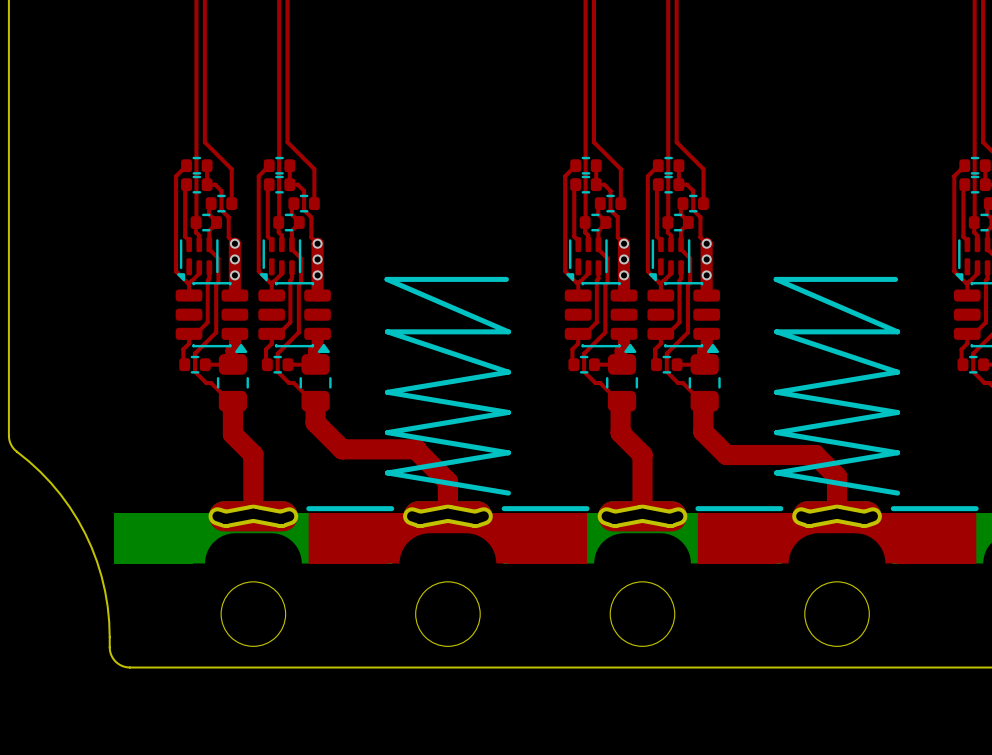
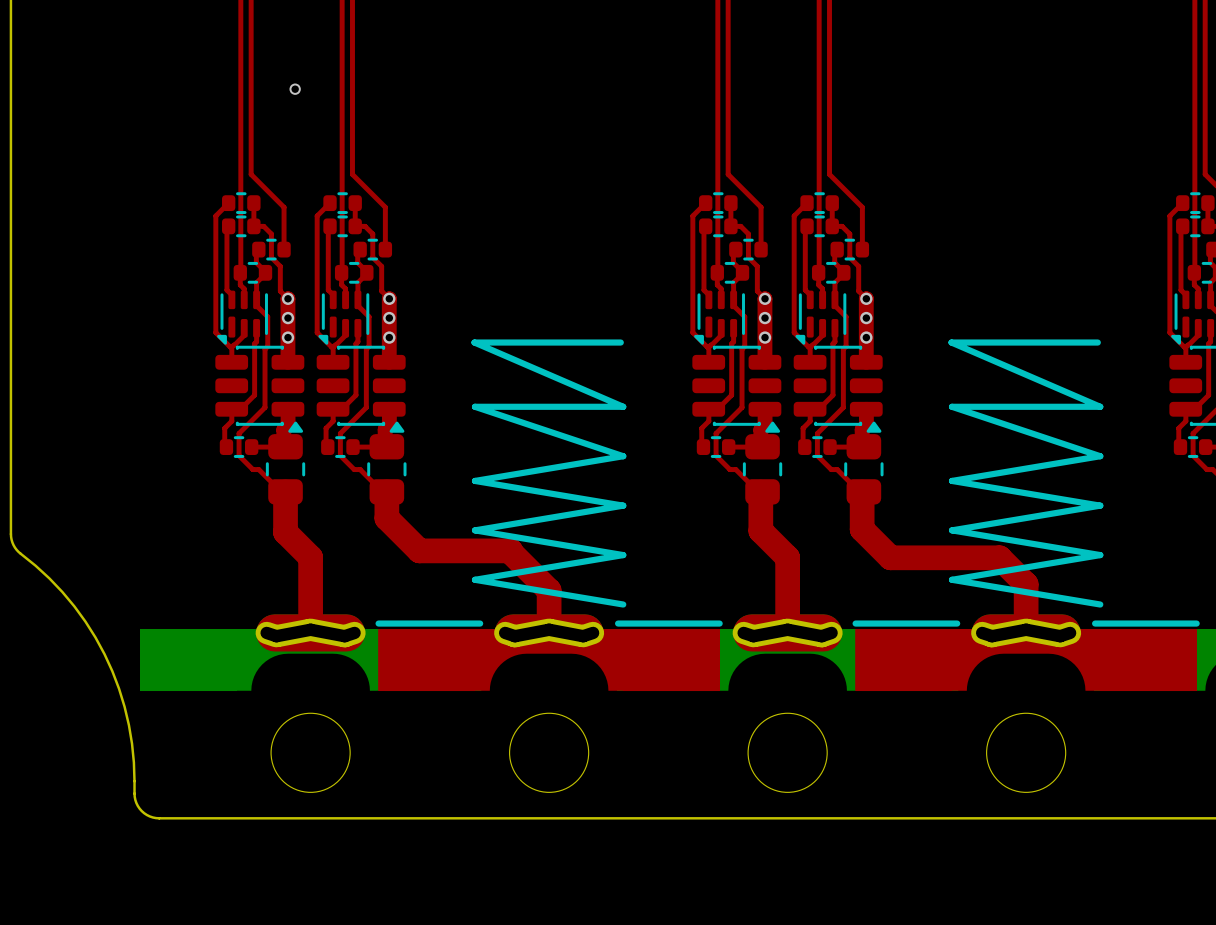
via: none -> (295, 89)

